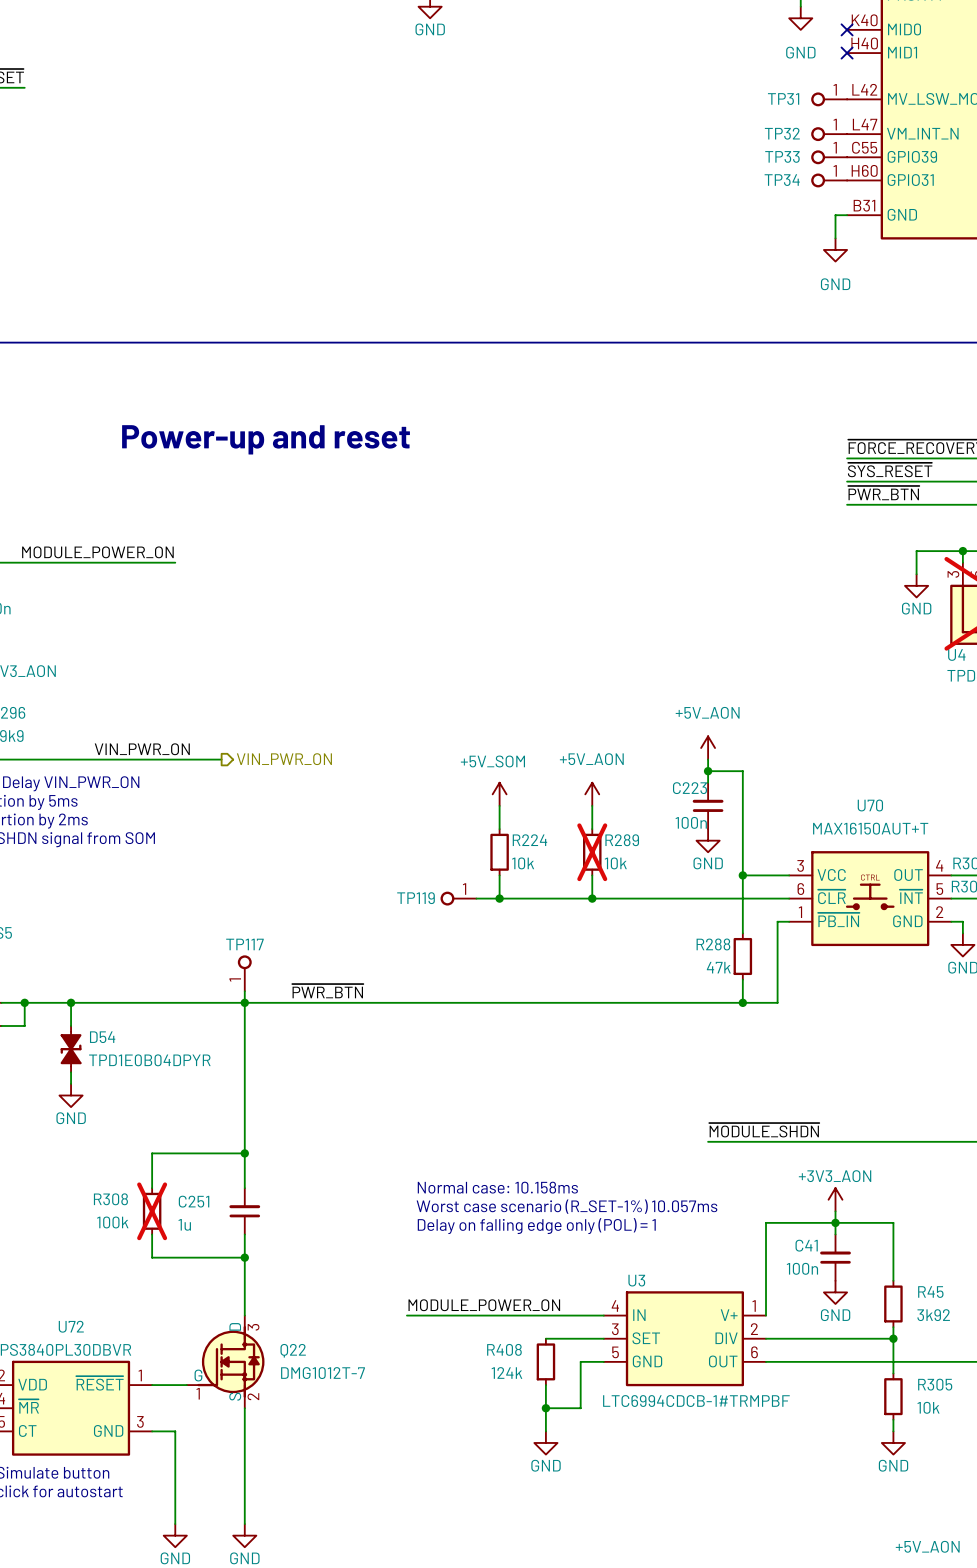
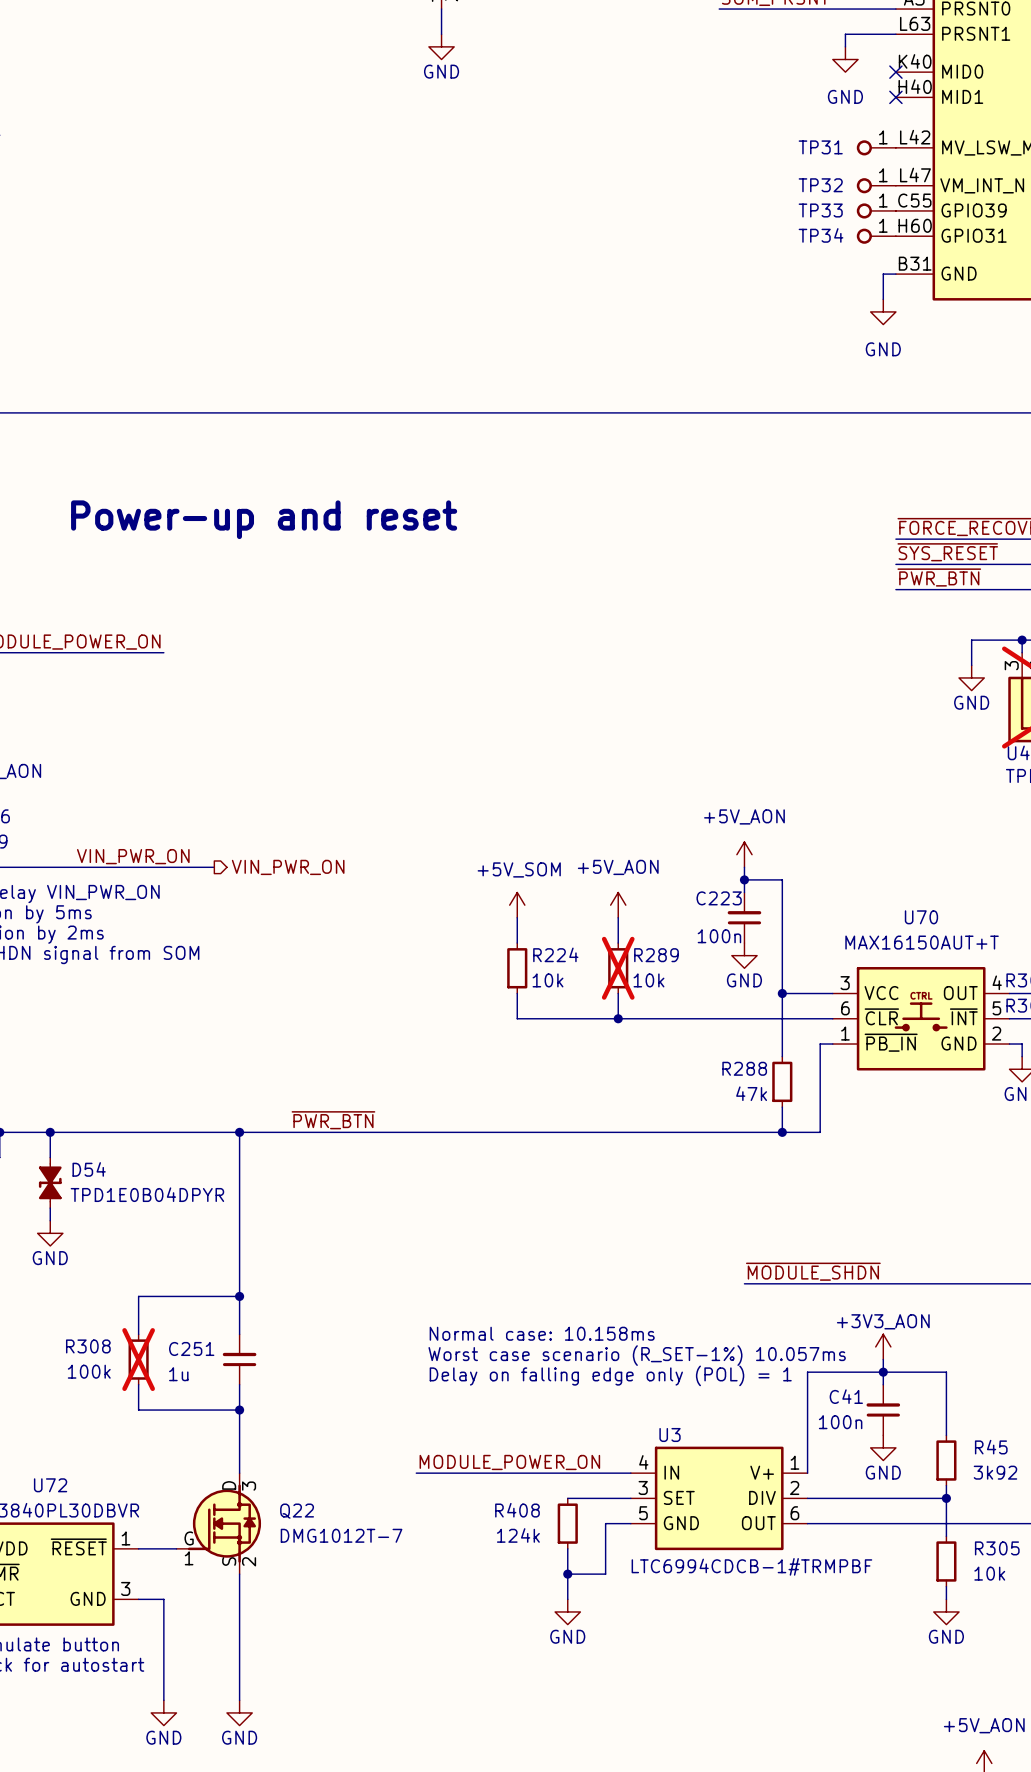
TP119: (458, 898) -> none
wire: (476, 898) (499, 898) -> none
junction: (499, 898) -> none
TP117: (244, 973) -> none
wire: (244, 991) (244, 1002) -> none

